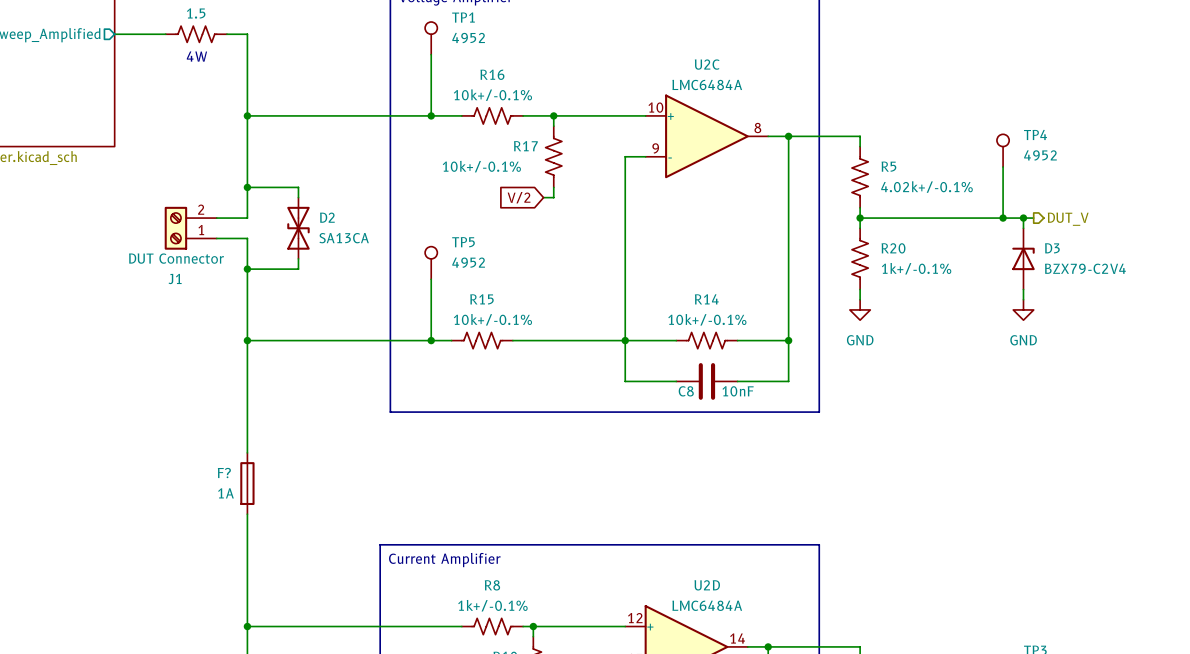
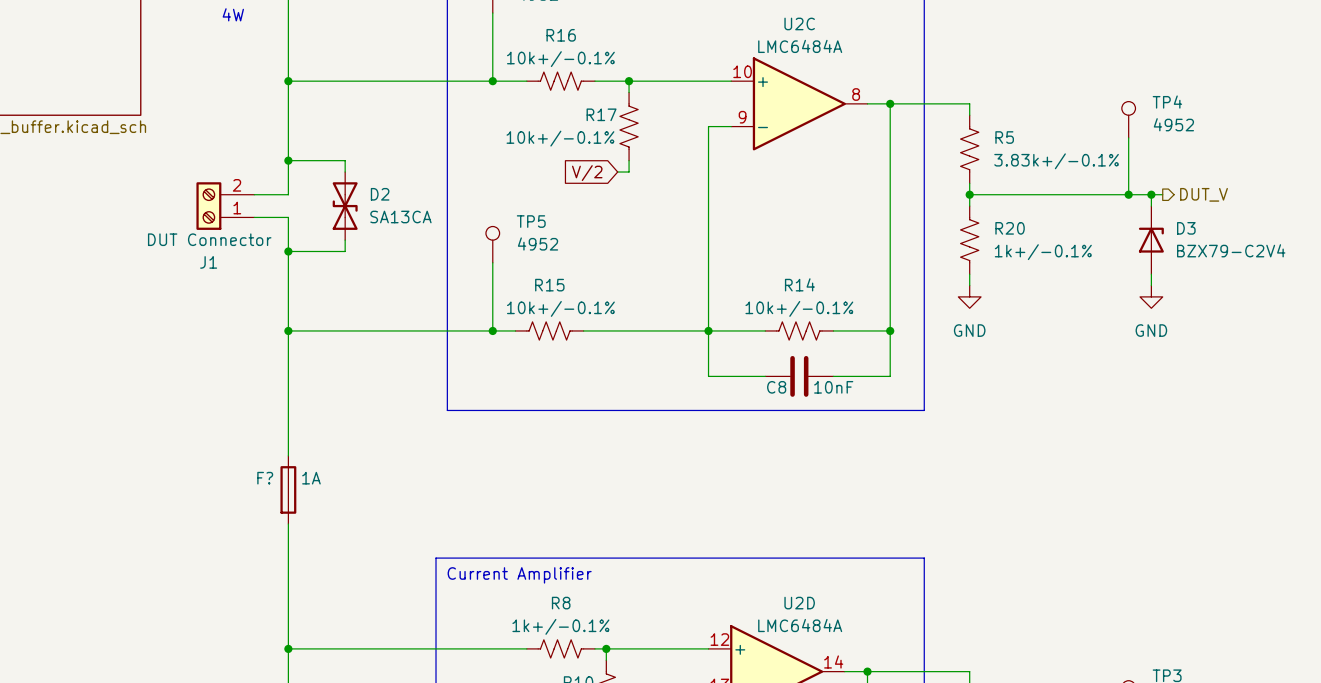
R5 value: 4.02k+/-0.1% (926, 187) -> 3.83k+/-0.1% (1056, 161)
F? value position: 1A (225, 493) -> 1A (311, 478)

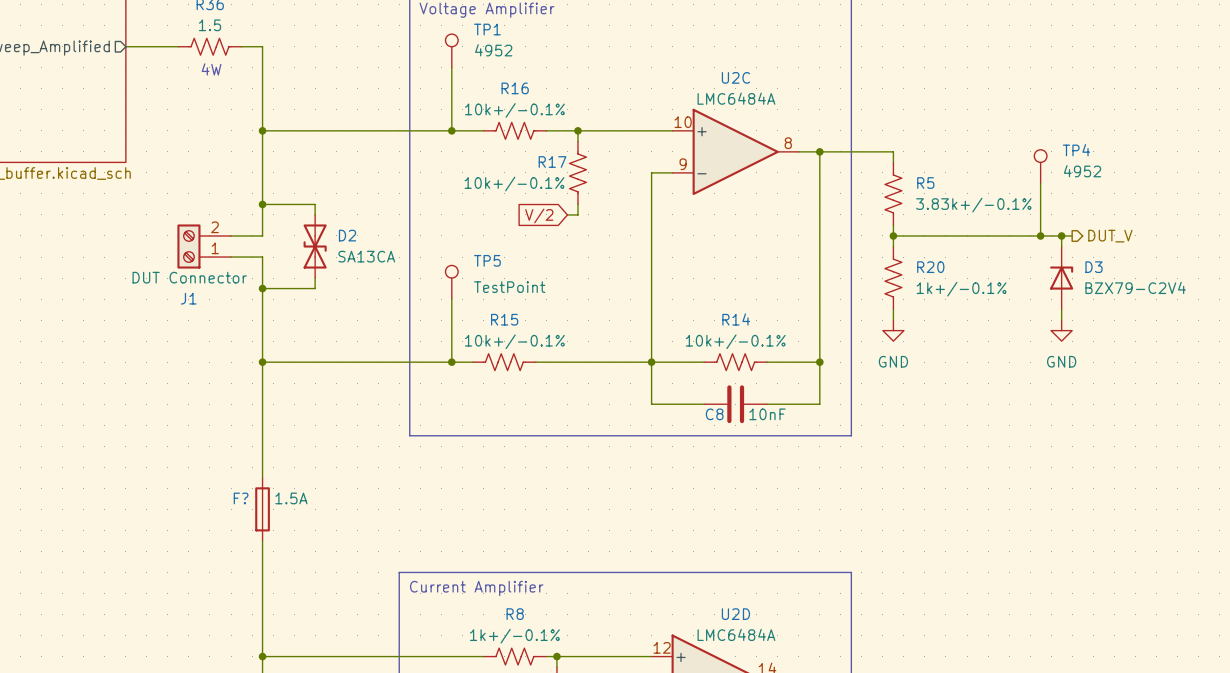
TP5 value: 4952 (538, 243) -> TestPoint (509, 287)
F? value: 1A (311, 478) -> 1.5A (291, 498)

